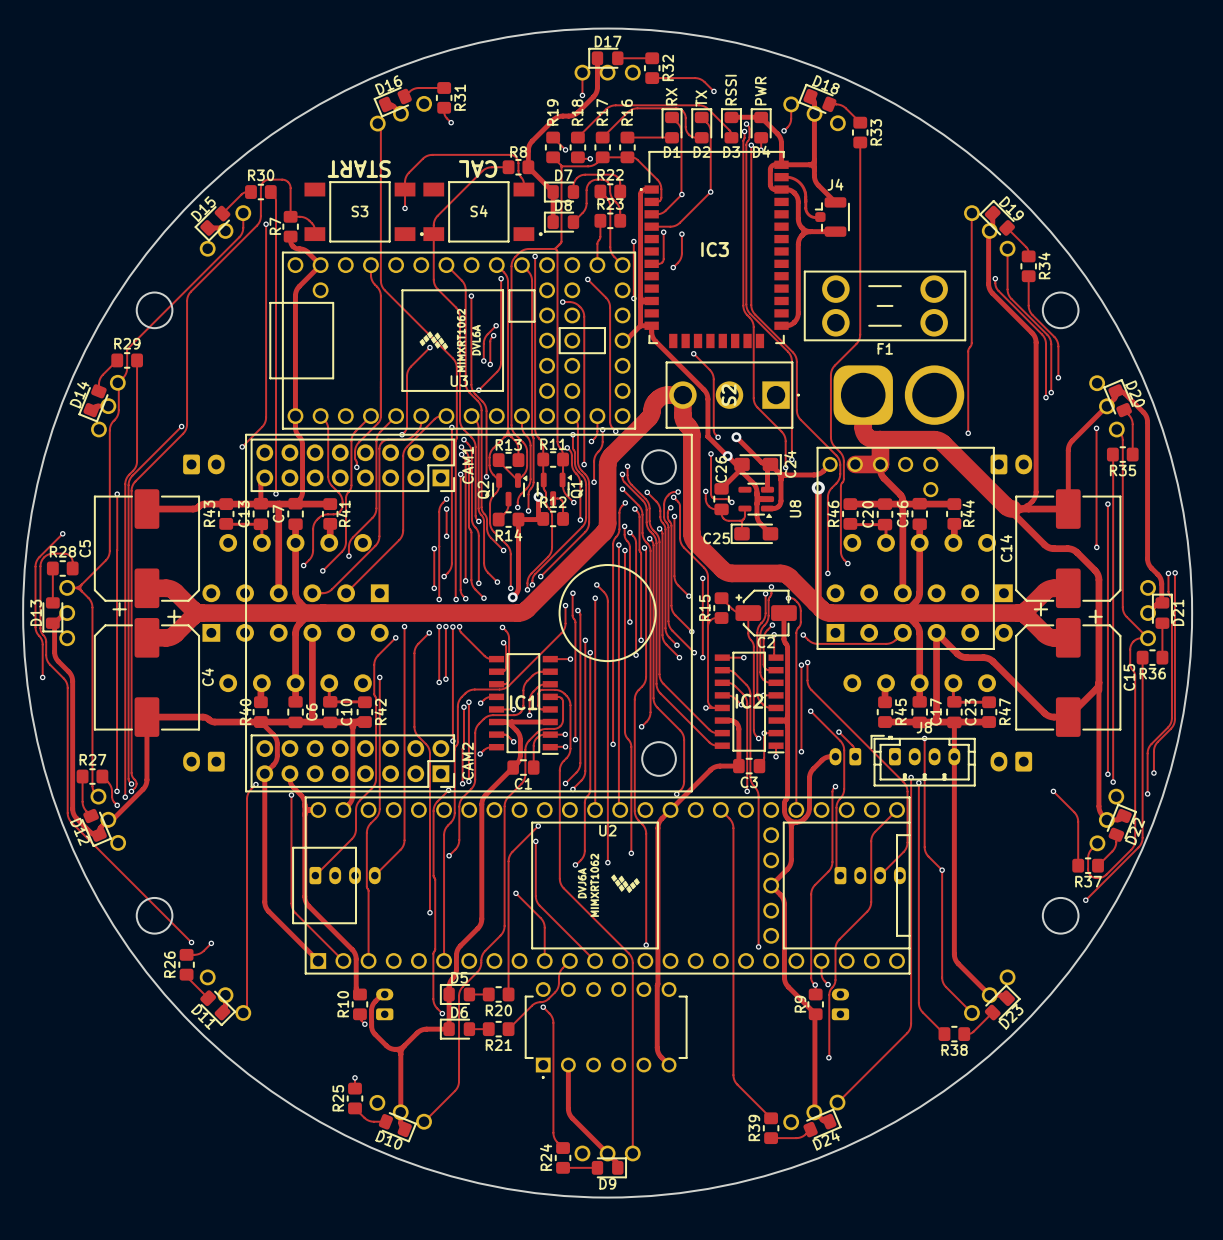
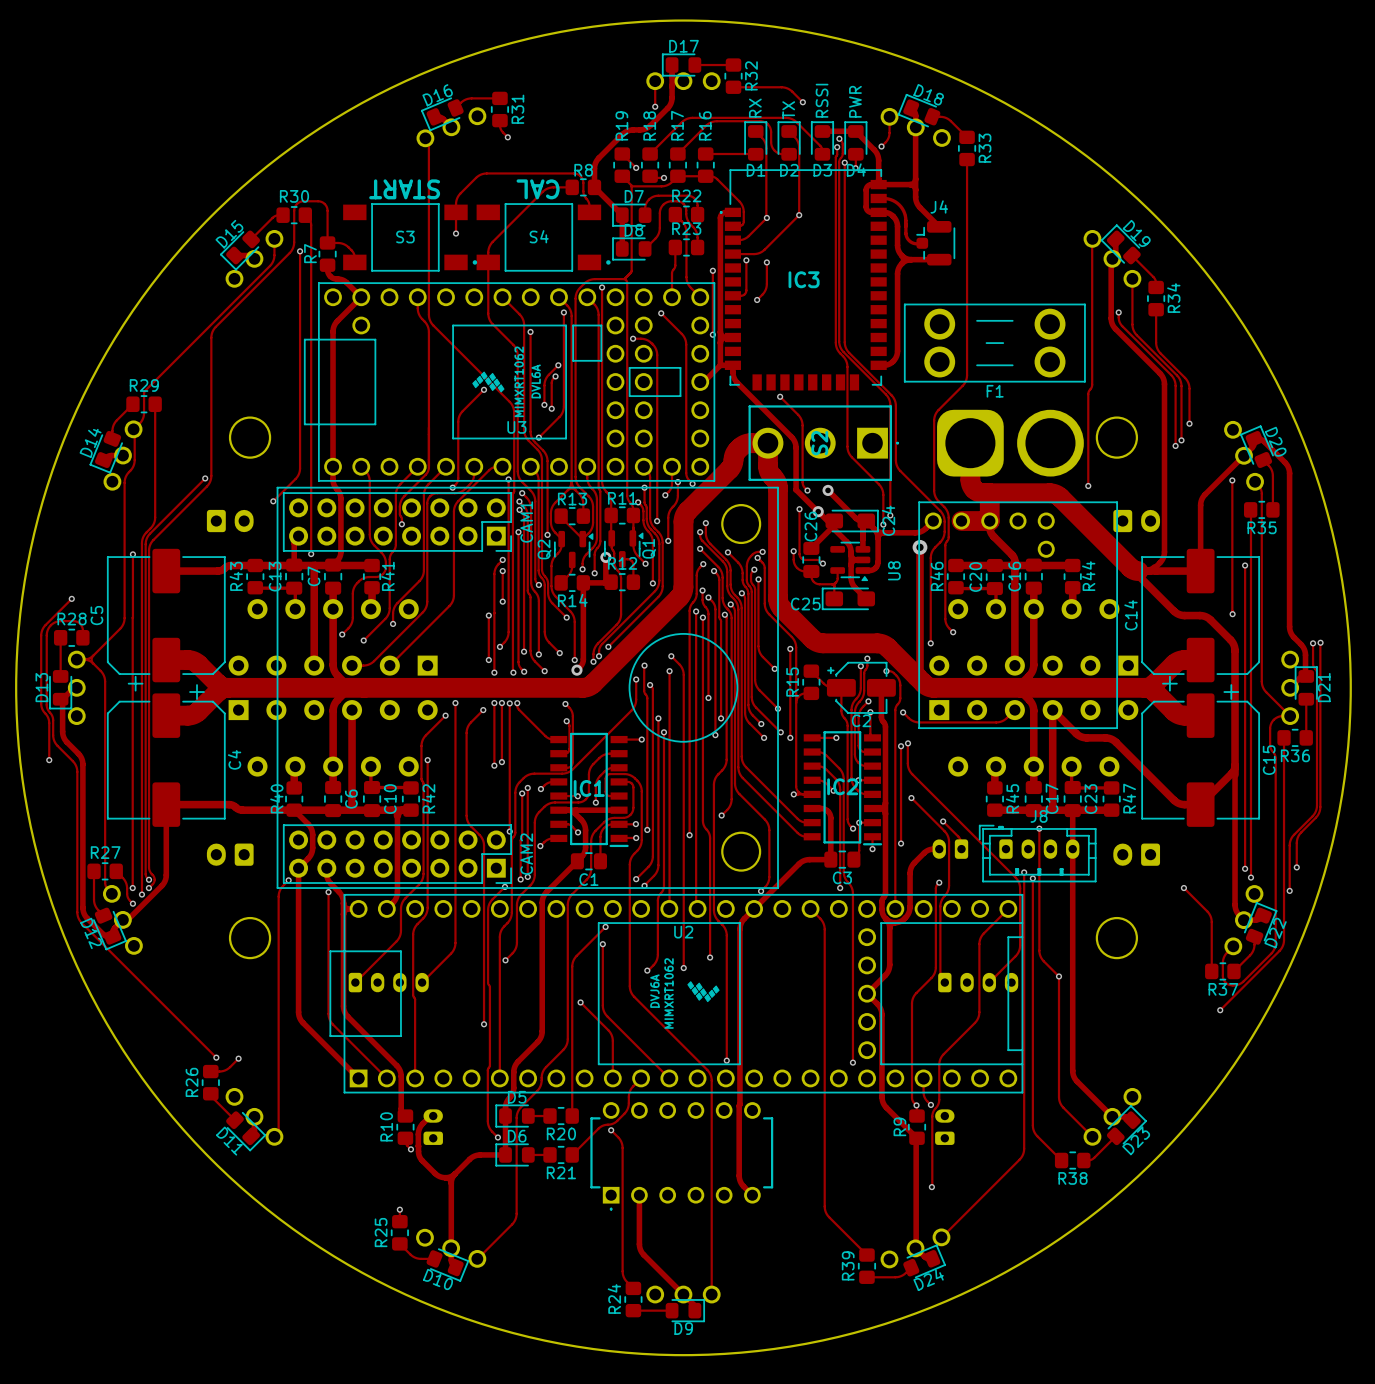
round board edge size: [22, 27, 1194, 1199] -> [15, 19, 1352, 1357]
round board edge position: (154, 310) -> (250, 437)
round board edge position: (1060, 310) -> (1116, 437)
round board edge position: (154, 915) -> (250, 938)
round board edge position: (1060, 915) -> (1116, 938)

